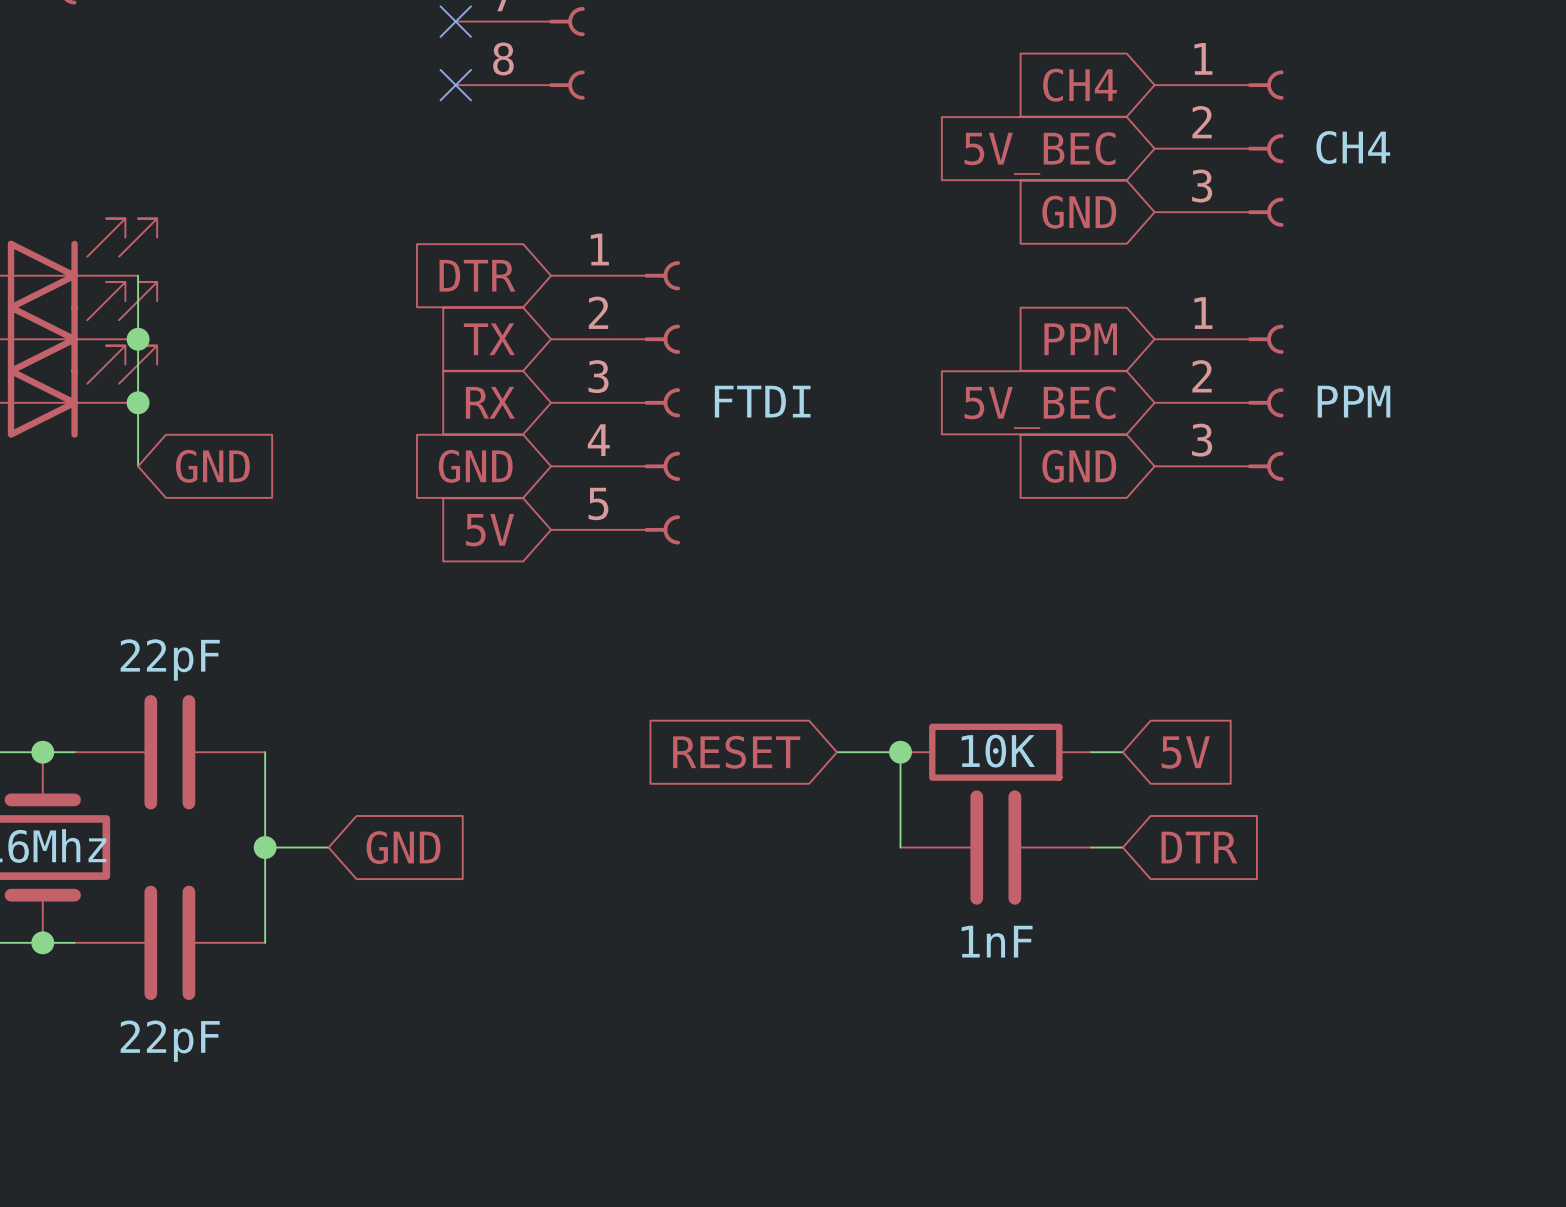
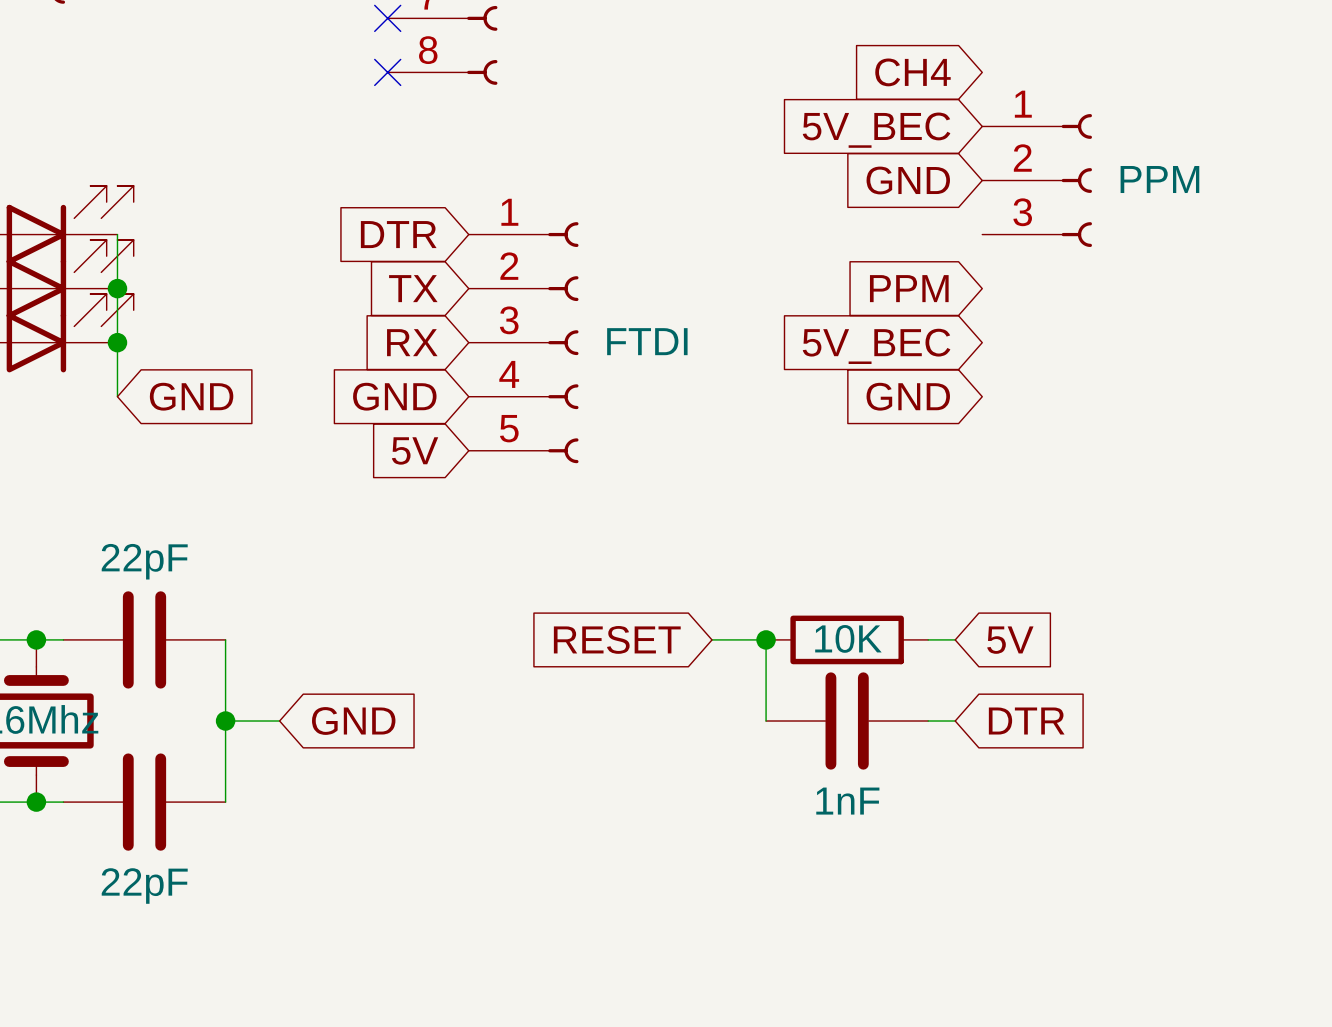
part: CH4 (1219, 148) -> none
part position: (1219, 402) -> (1037, 180)

